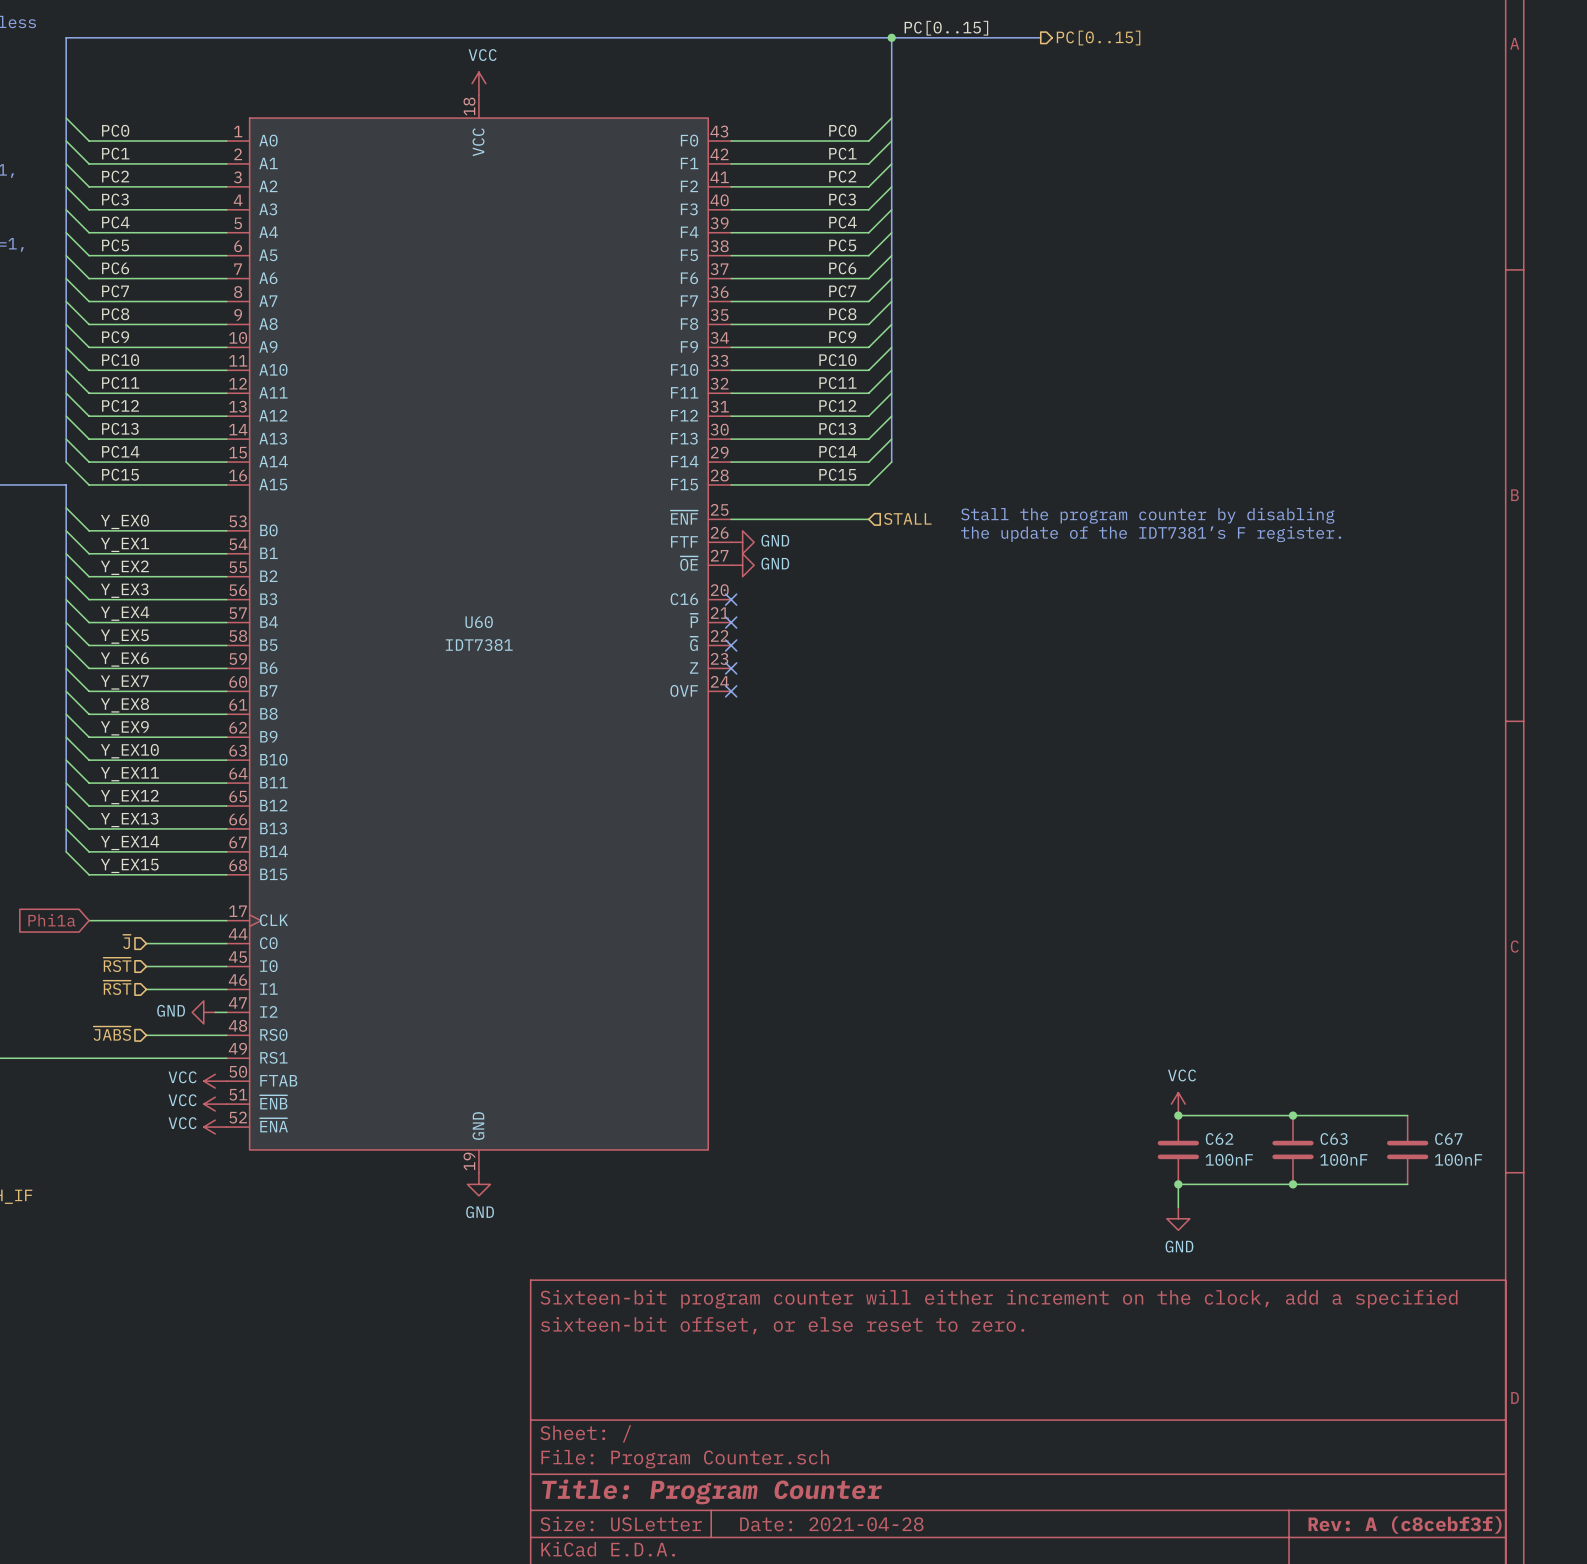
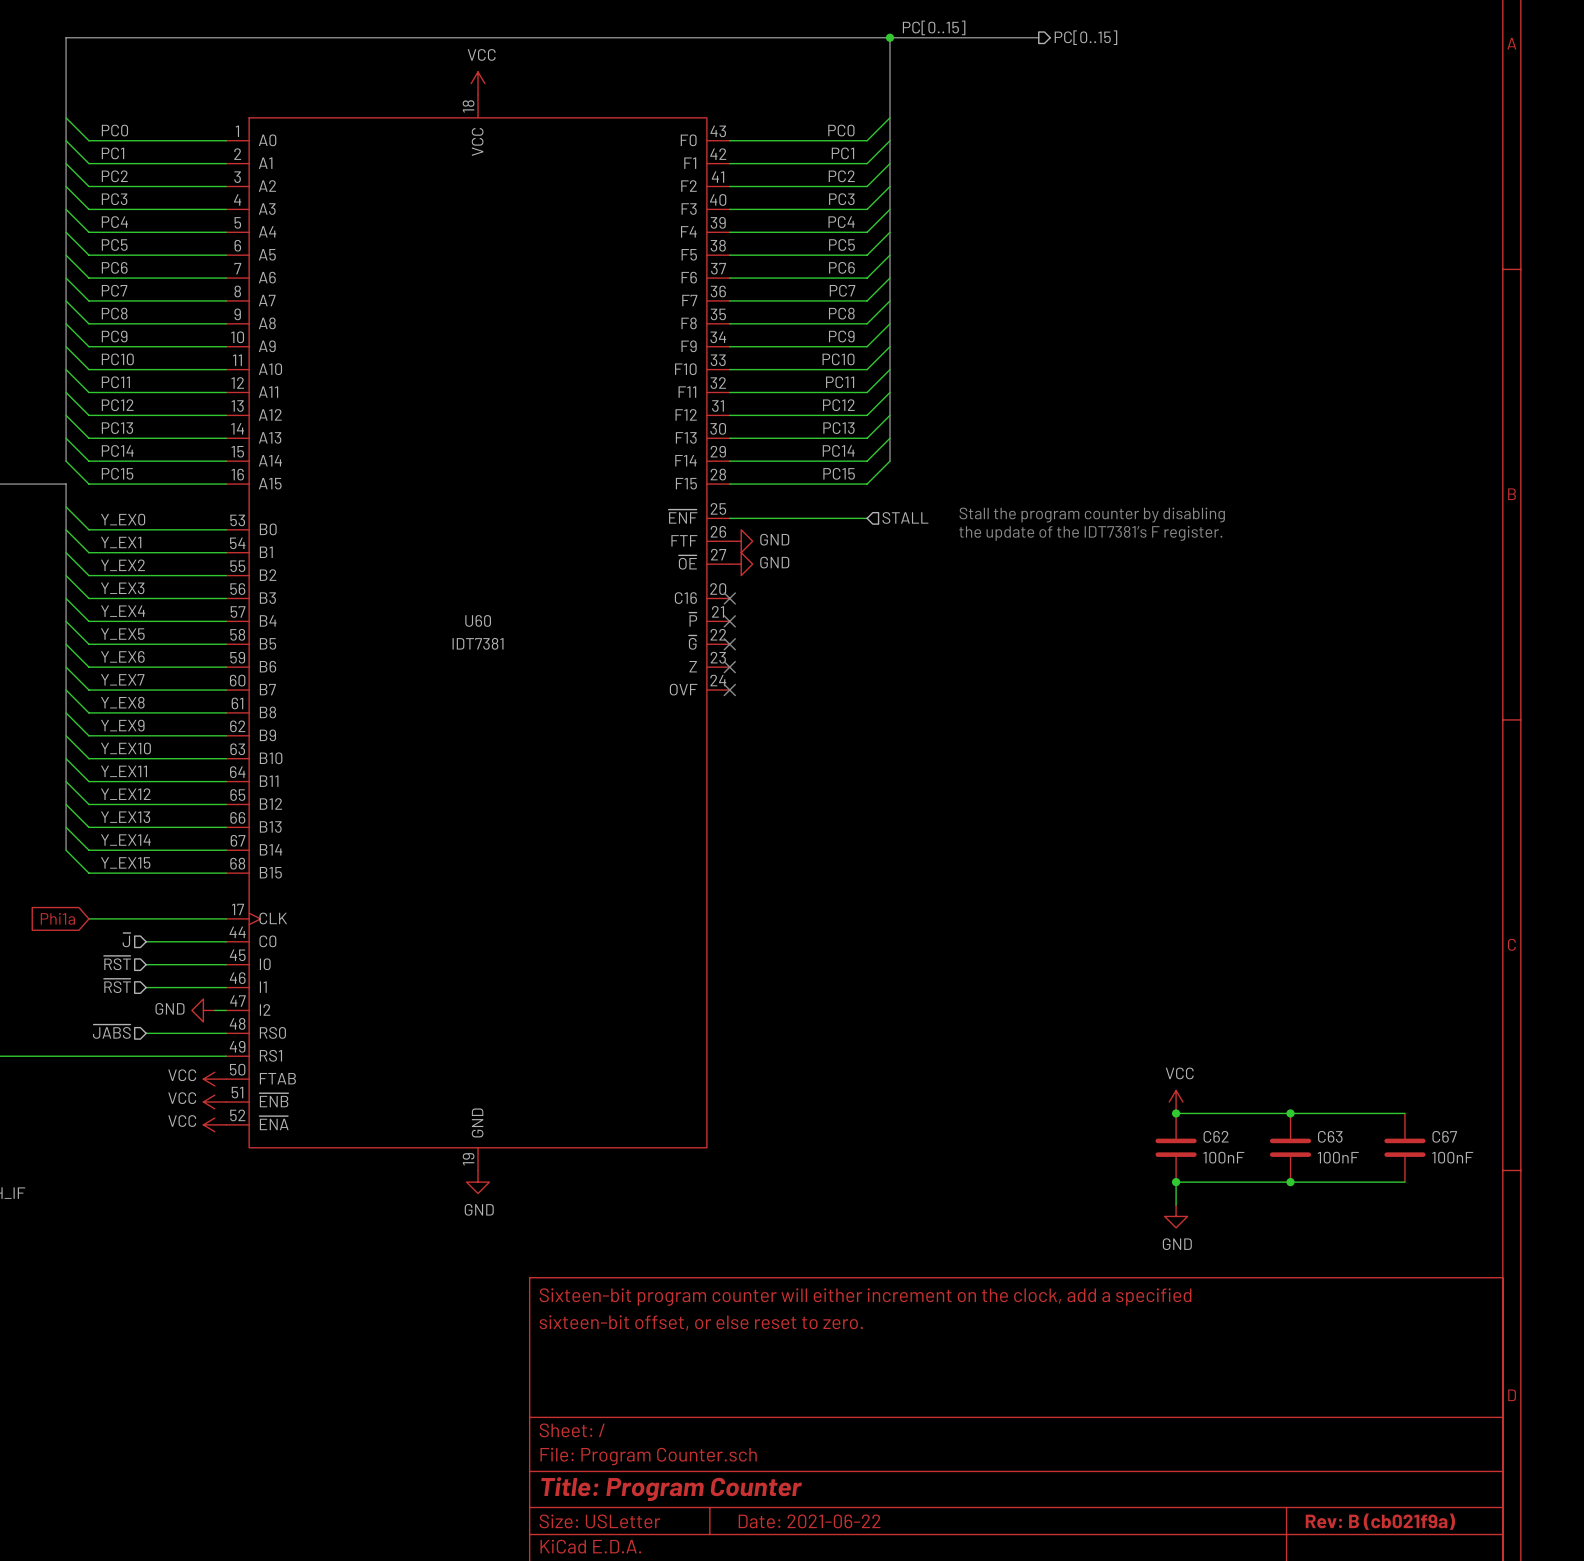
title block: Date: 2021-04-28 (831, 1524) -> Date: 2021-06-22 (809, 1521)
title block: Rev: A (c8cebf3f) (1405, 1525) -> Rev: B (cb021f9a) (1380, 1521)

